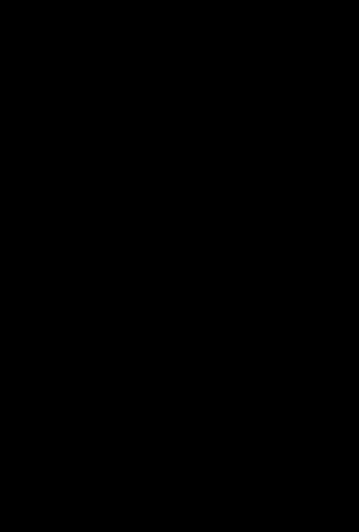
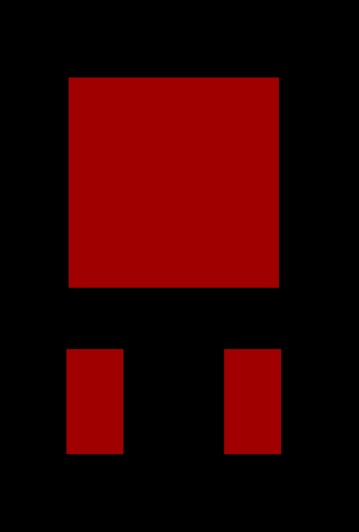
part: none -> (173, 265)

